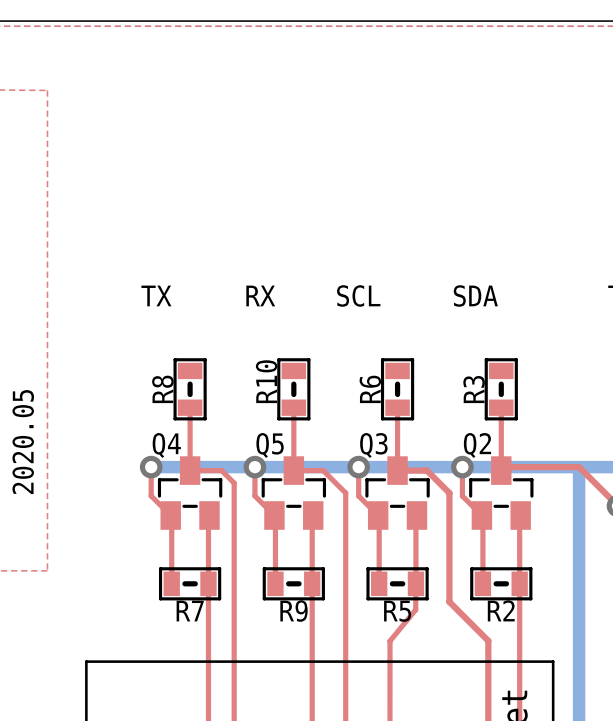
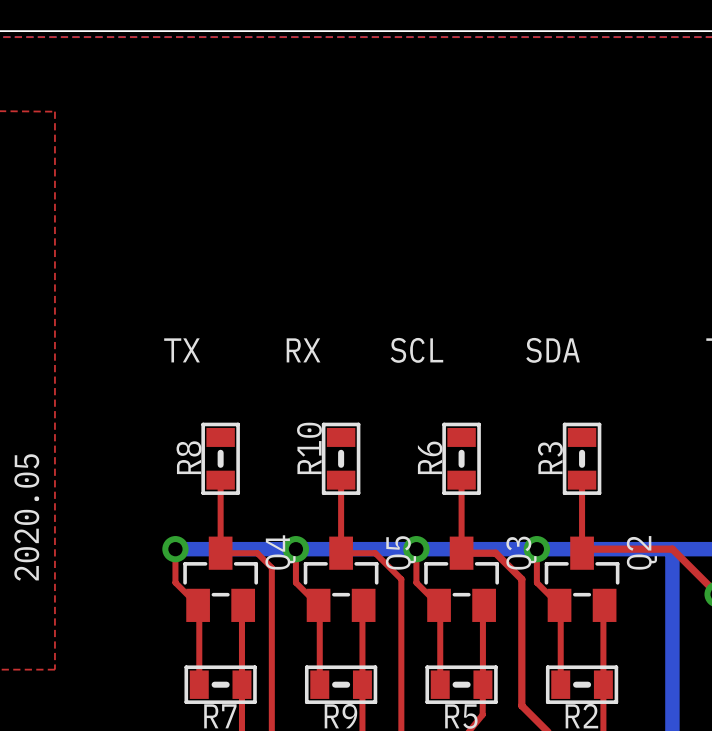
Q4 name rotation: 0° (166, 445) -> 90° counterclockwise (280, 552)
Q4 name position: Q4 (166, 445) -> Q4 (280, 552)
Q5 name rotation: 0° (270, 445) -> 90° counterclockwise (400, 552)
Q5 name position: Q5 (270, 445) -> Q5 (400, 552)
Q3 name rotation: 0° (373, 445) -> 90° counterclockwise (521, 553)
Q3 name position: Q3 (373, 445) -> Q3 (521, 553)
Q2 name rotation: 0° (477, 445) -> 90° counterclockwise (641, 552)
Q2 name position: Q2 (477, 445) -> Q2 (641, 552)

